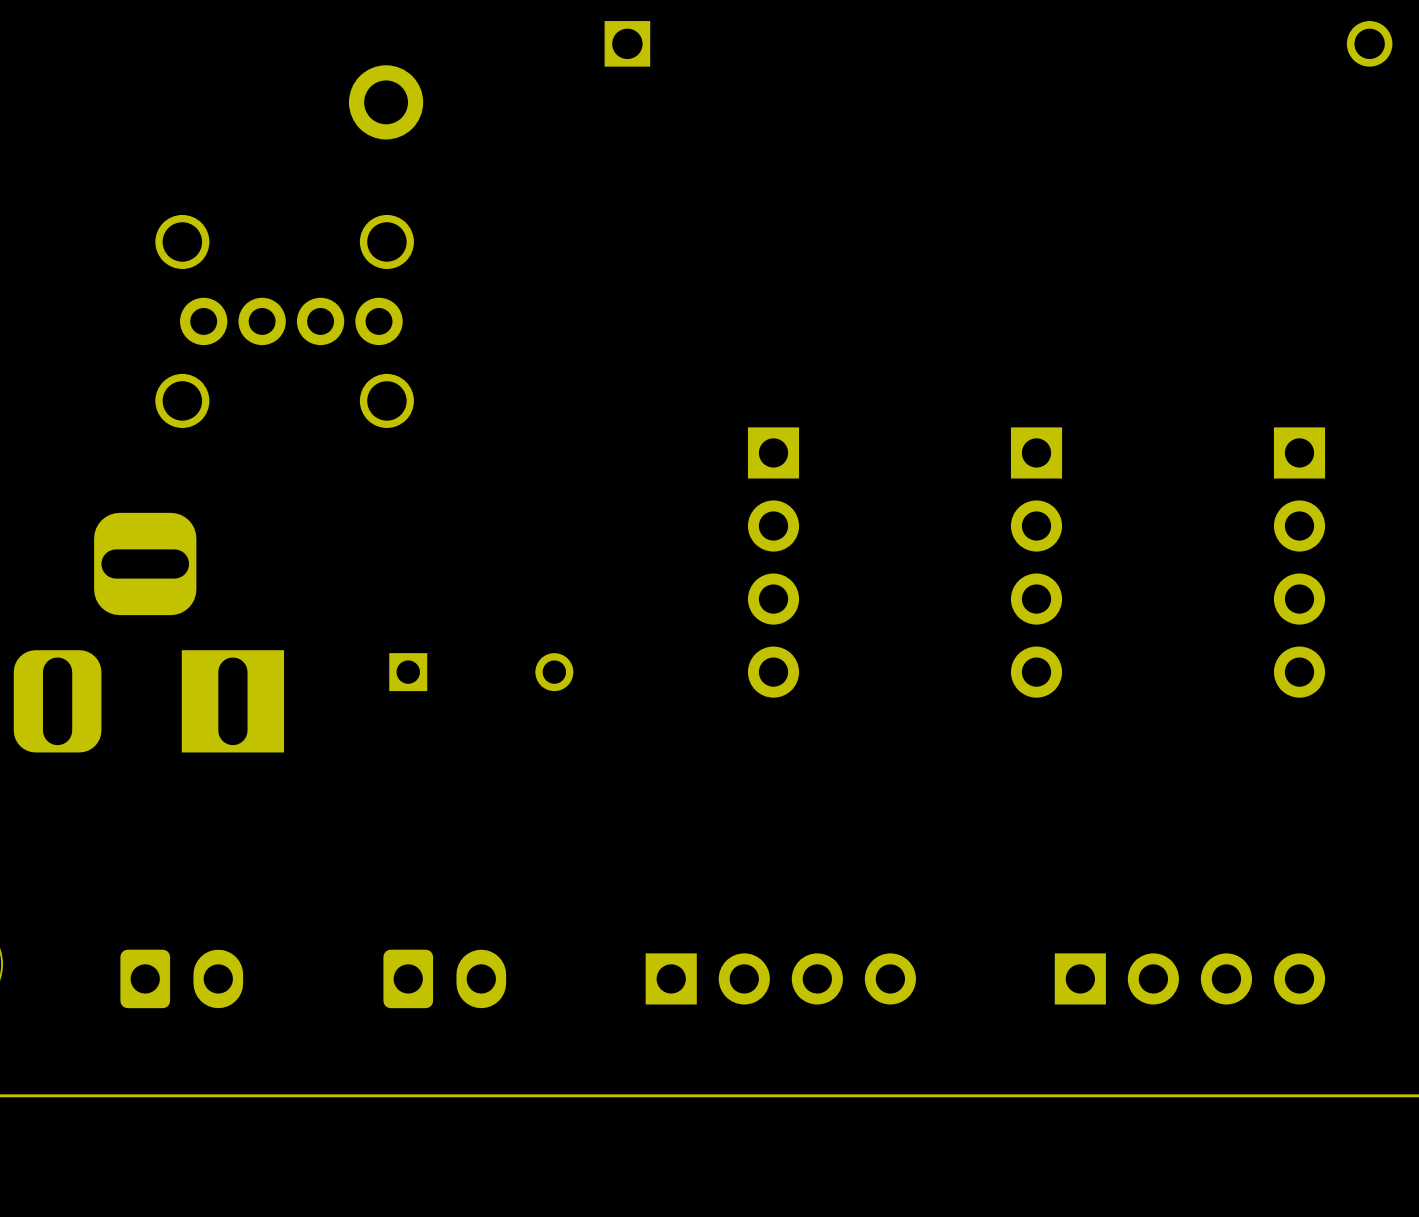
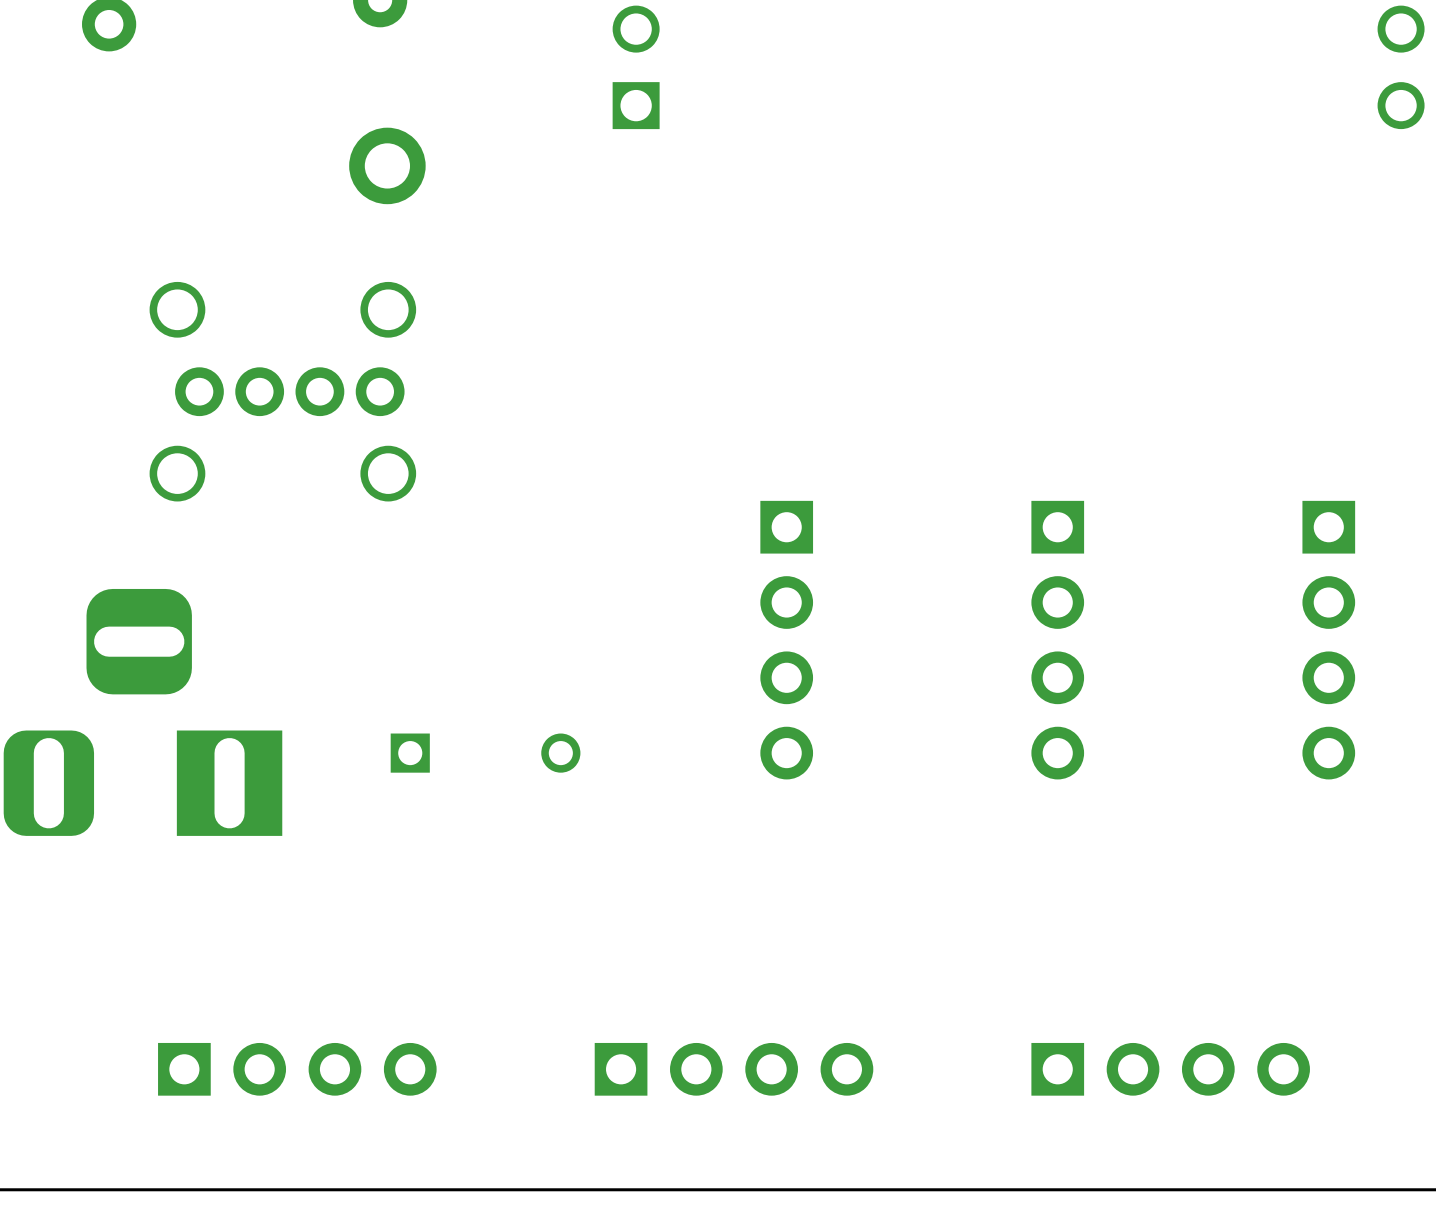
part: (181, 978) -> none
part: none -> (297, 1069)
part: (444, 978) -> none
part position: (780, 978) -> (734, 1069)
part position: (1189, 978) -> (1170, 1069)

